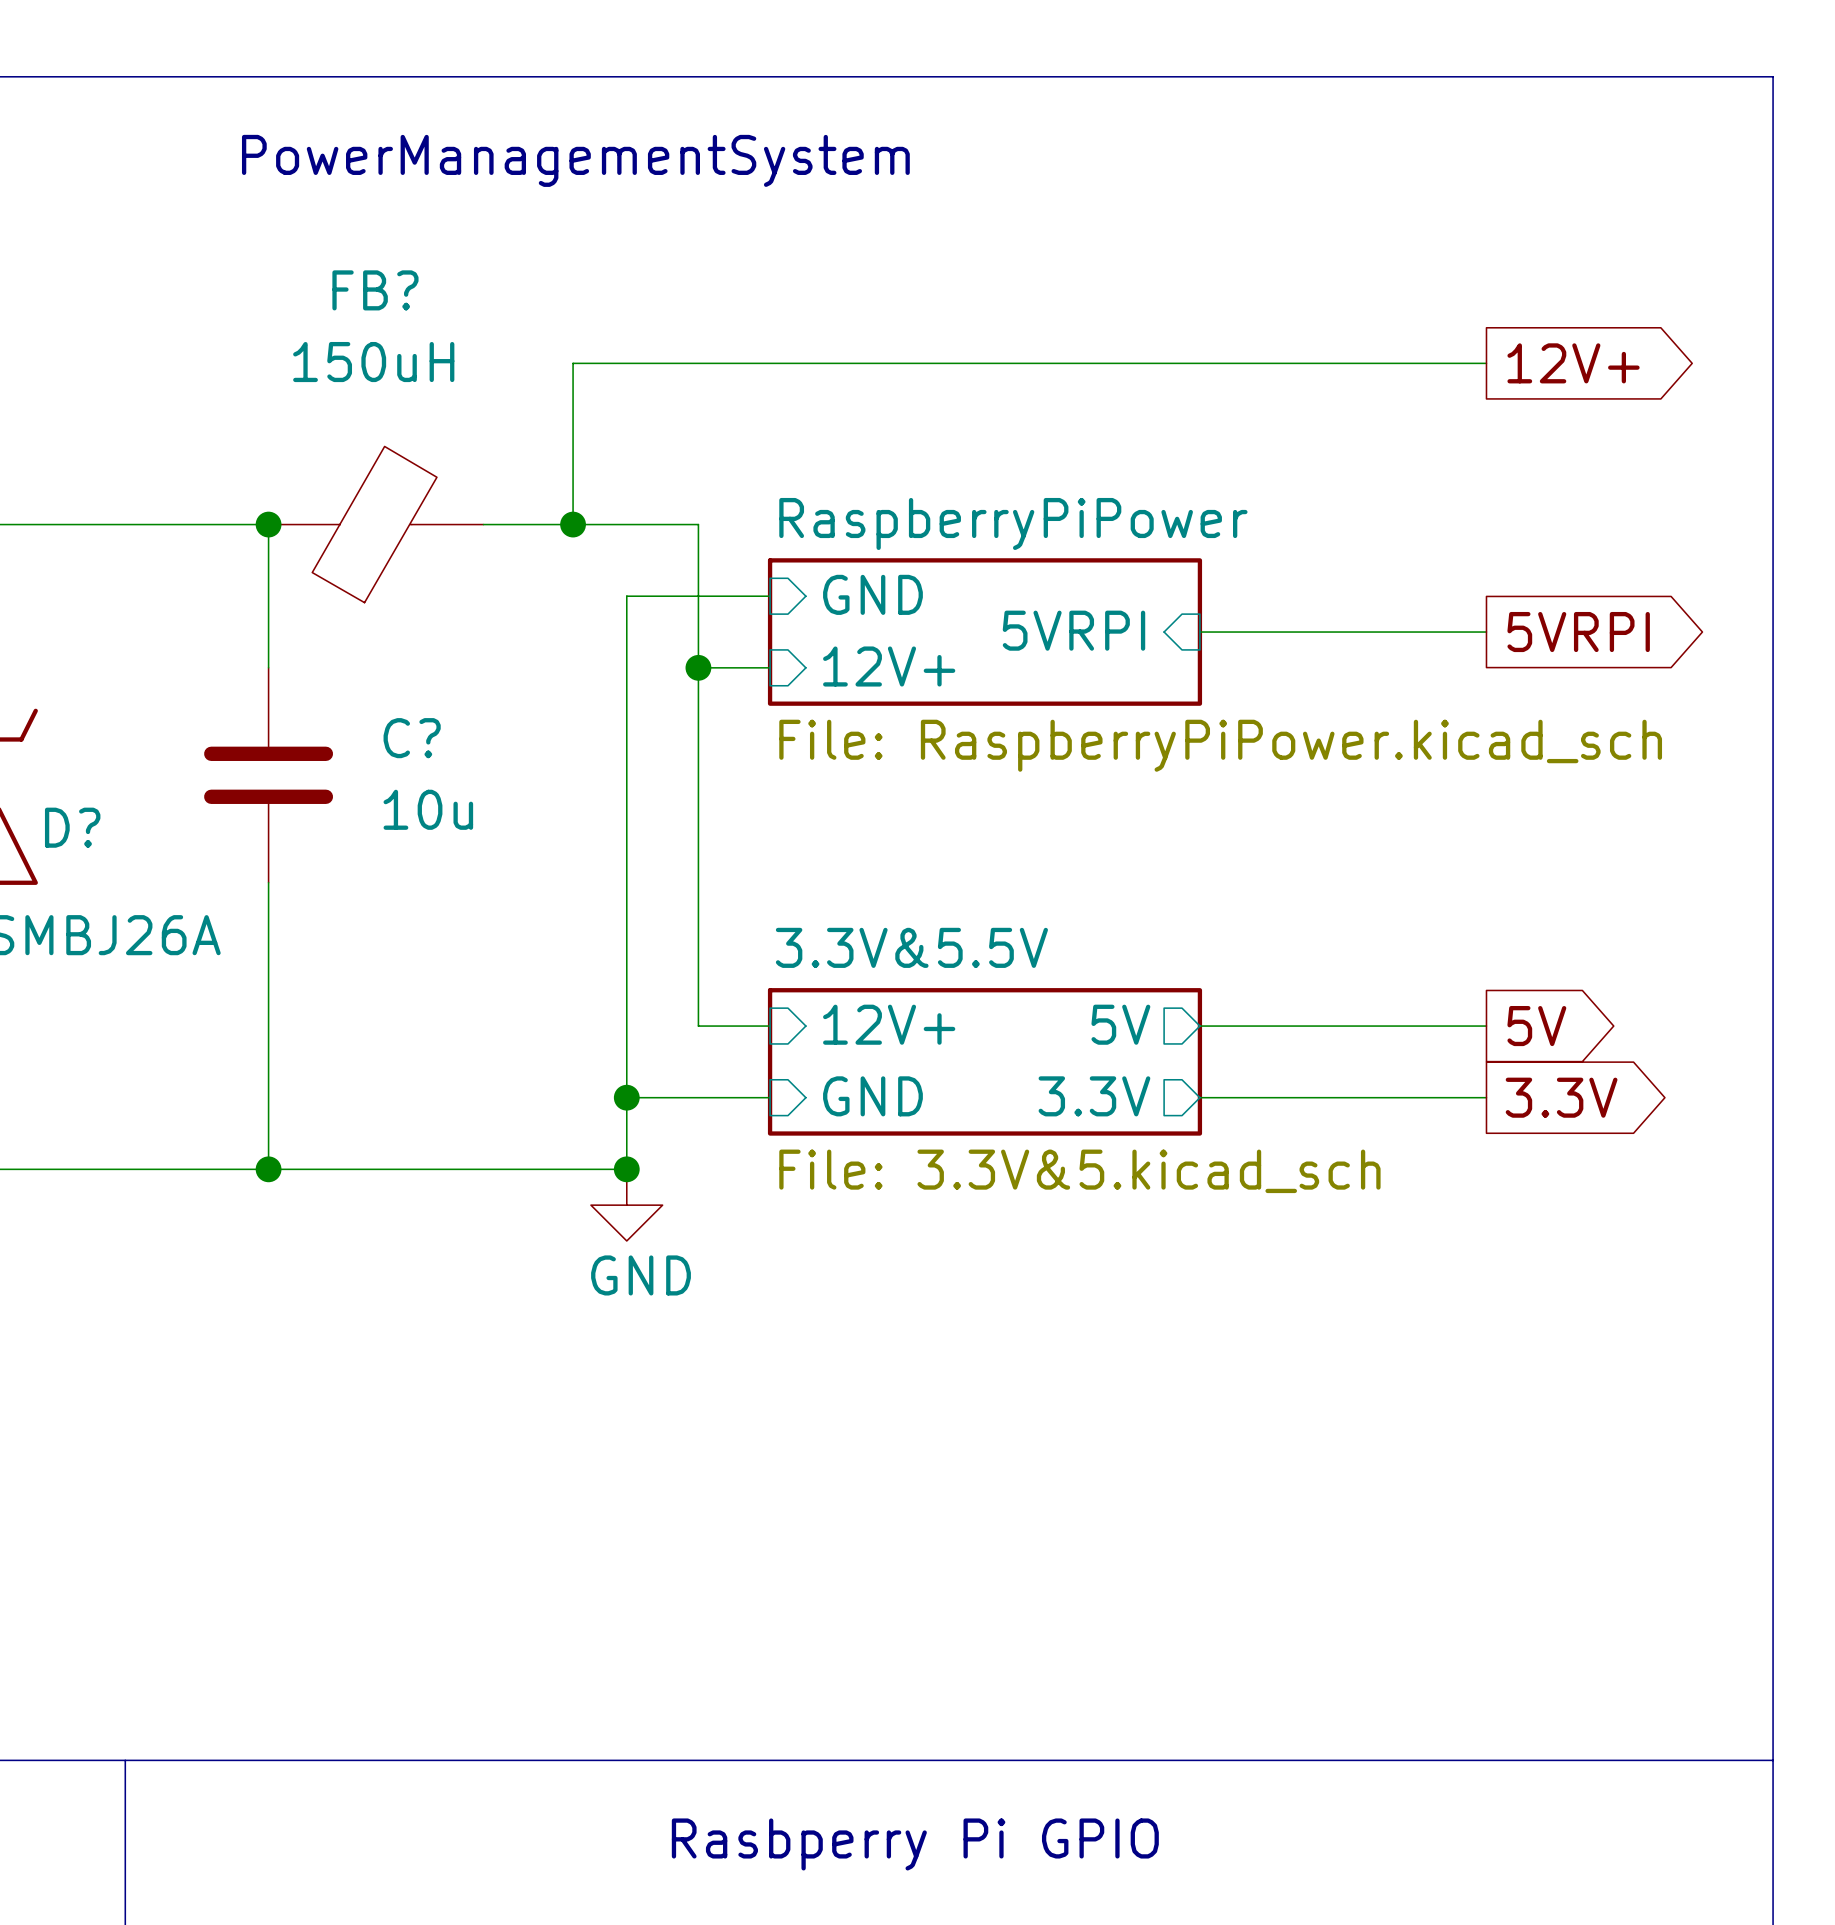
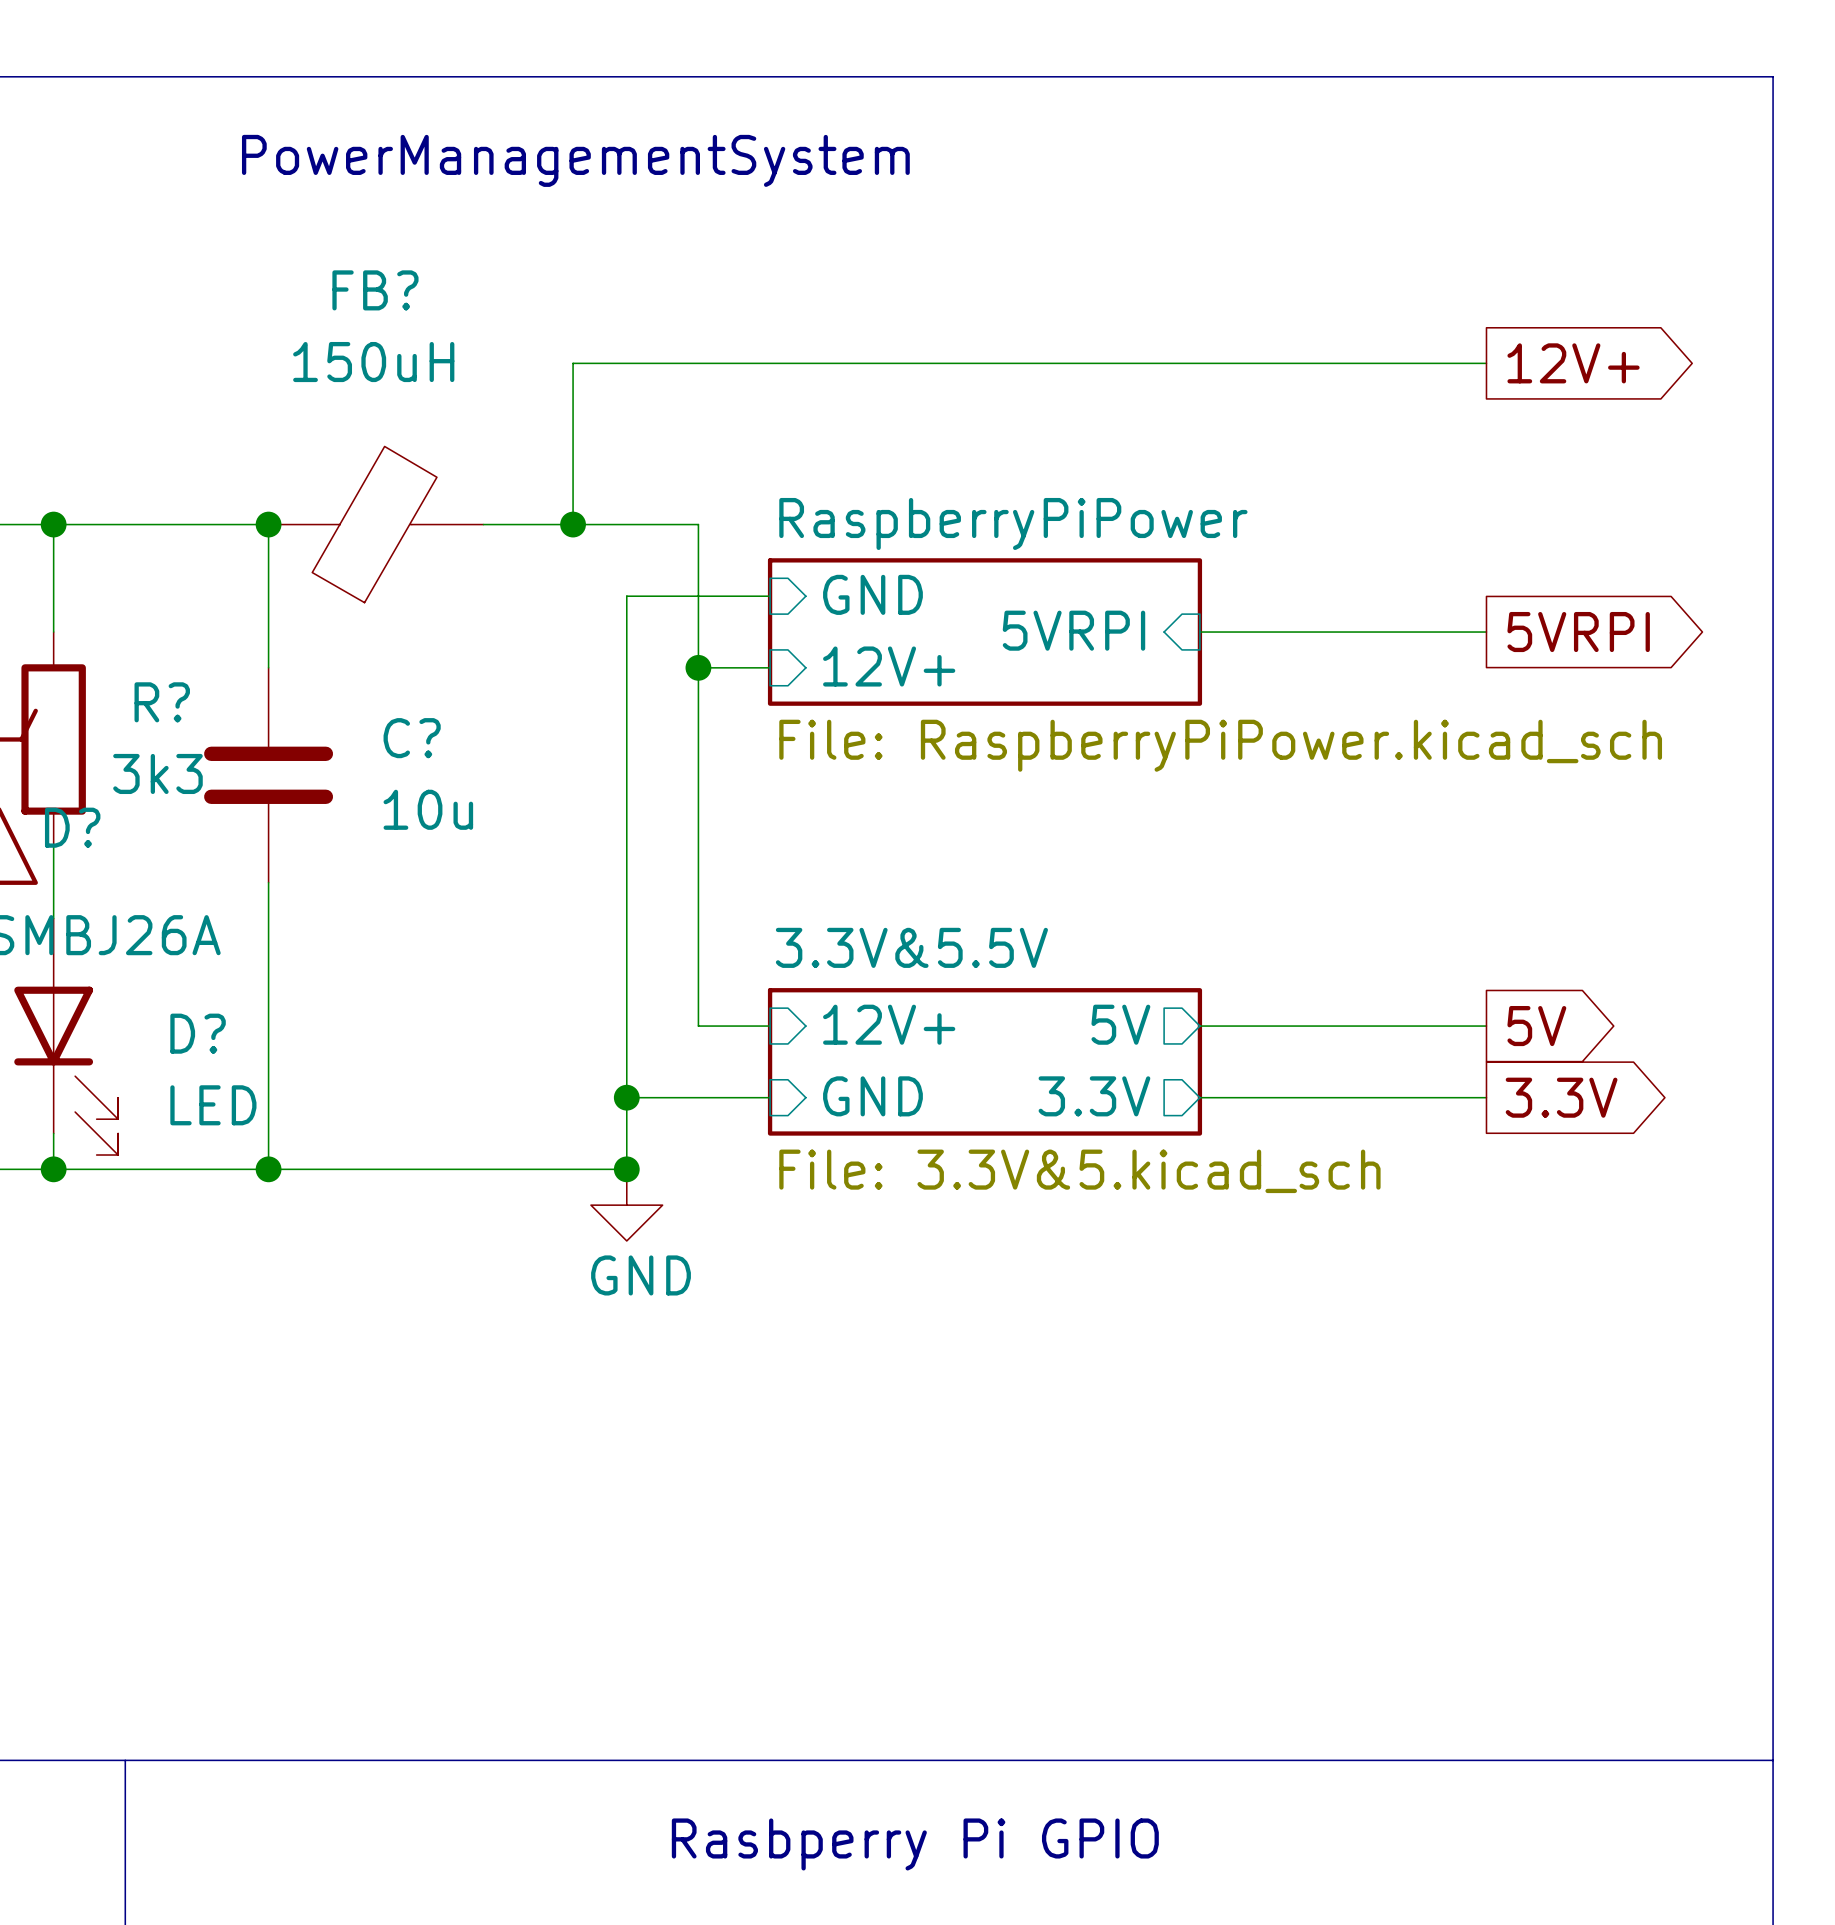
wire: none -> (53, 524) (53, 632)
junction: none -> (53, 524)
R?: none -> 3k3 (53, 739)
wire: none -> (53, 846) (53, 918)
D?: none -> LED (66, 1036)
wire: none -> (53, 1133) (53, 1169)
junction: none -> (53, 1169)

